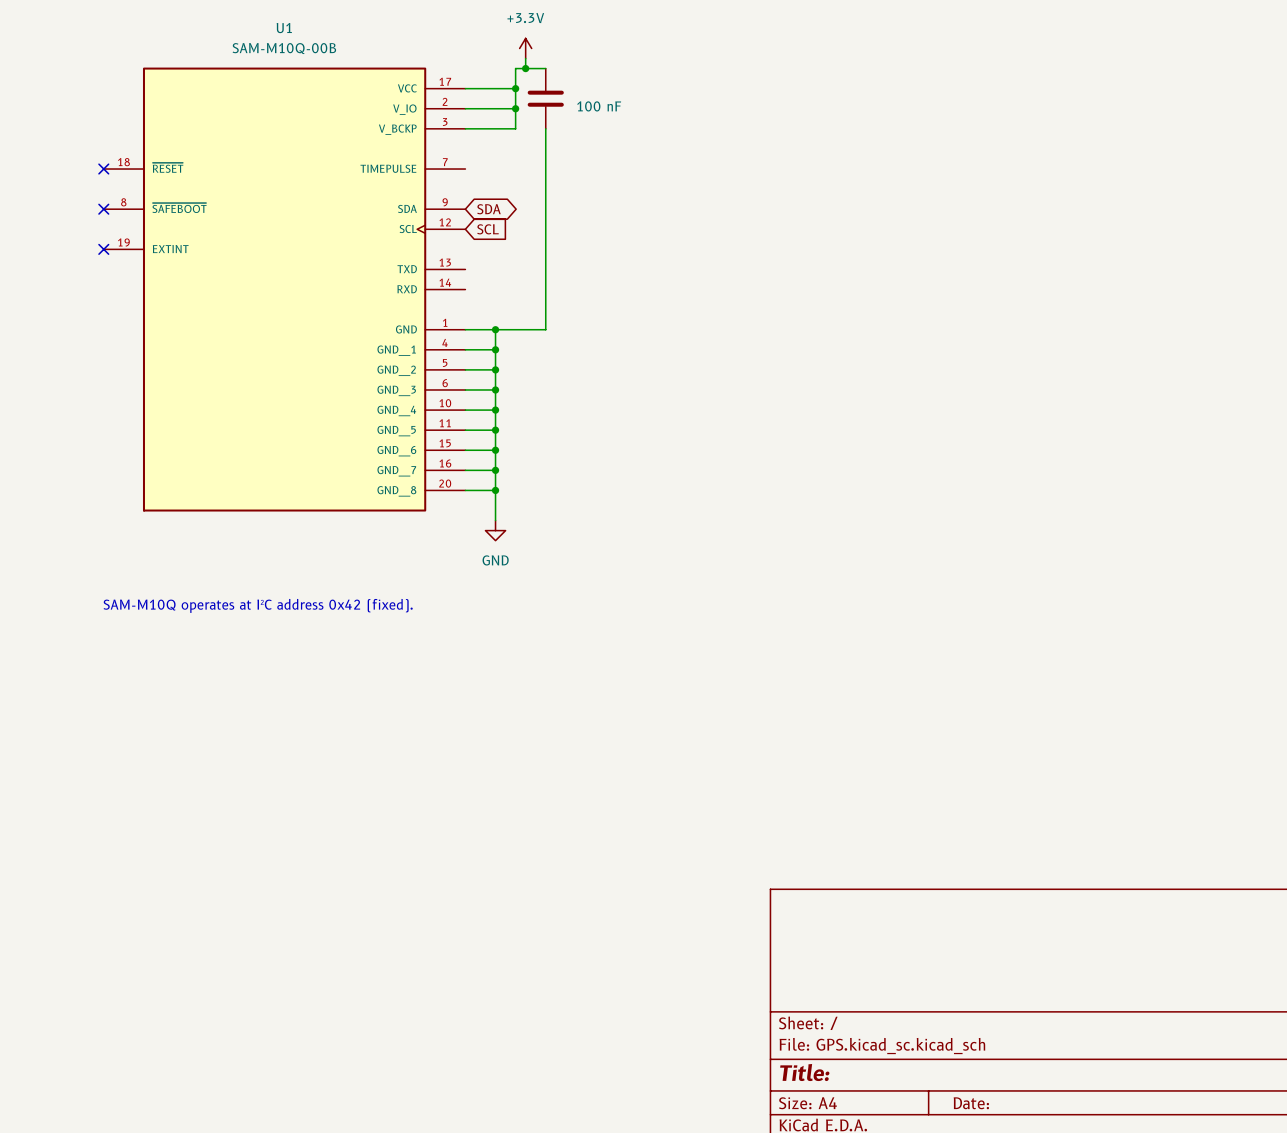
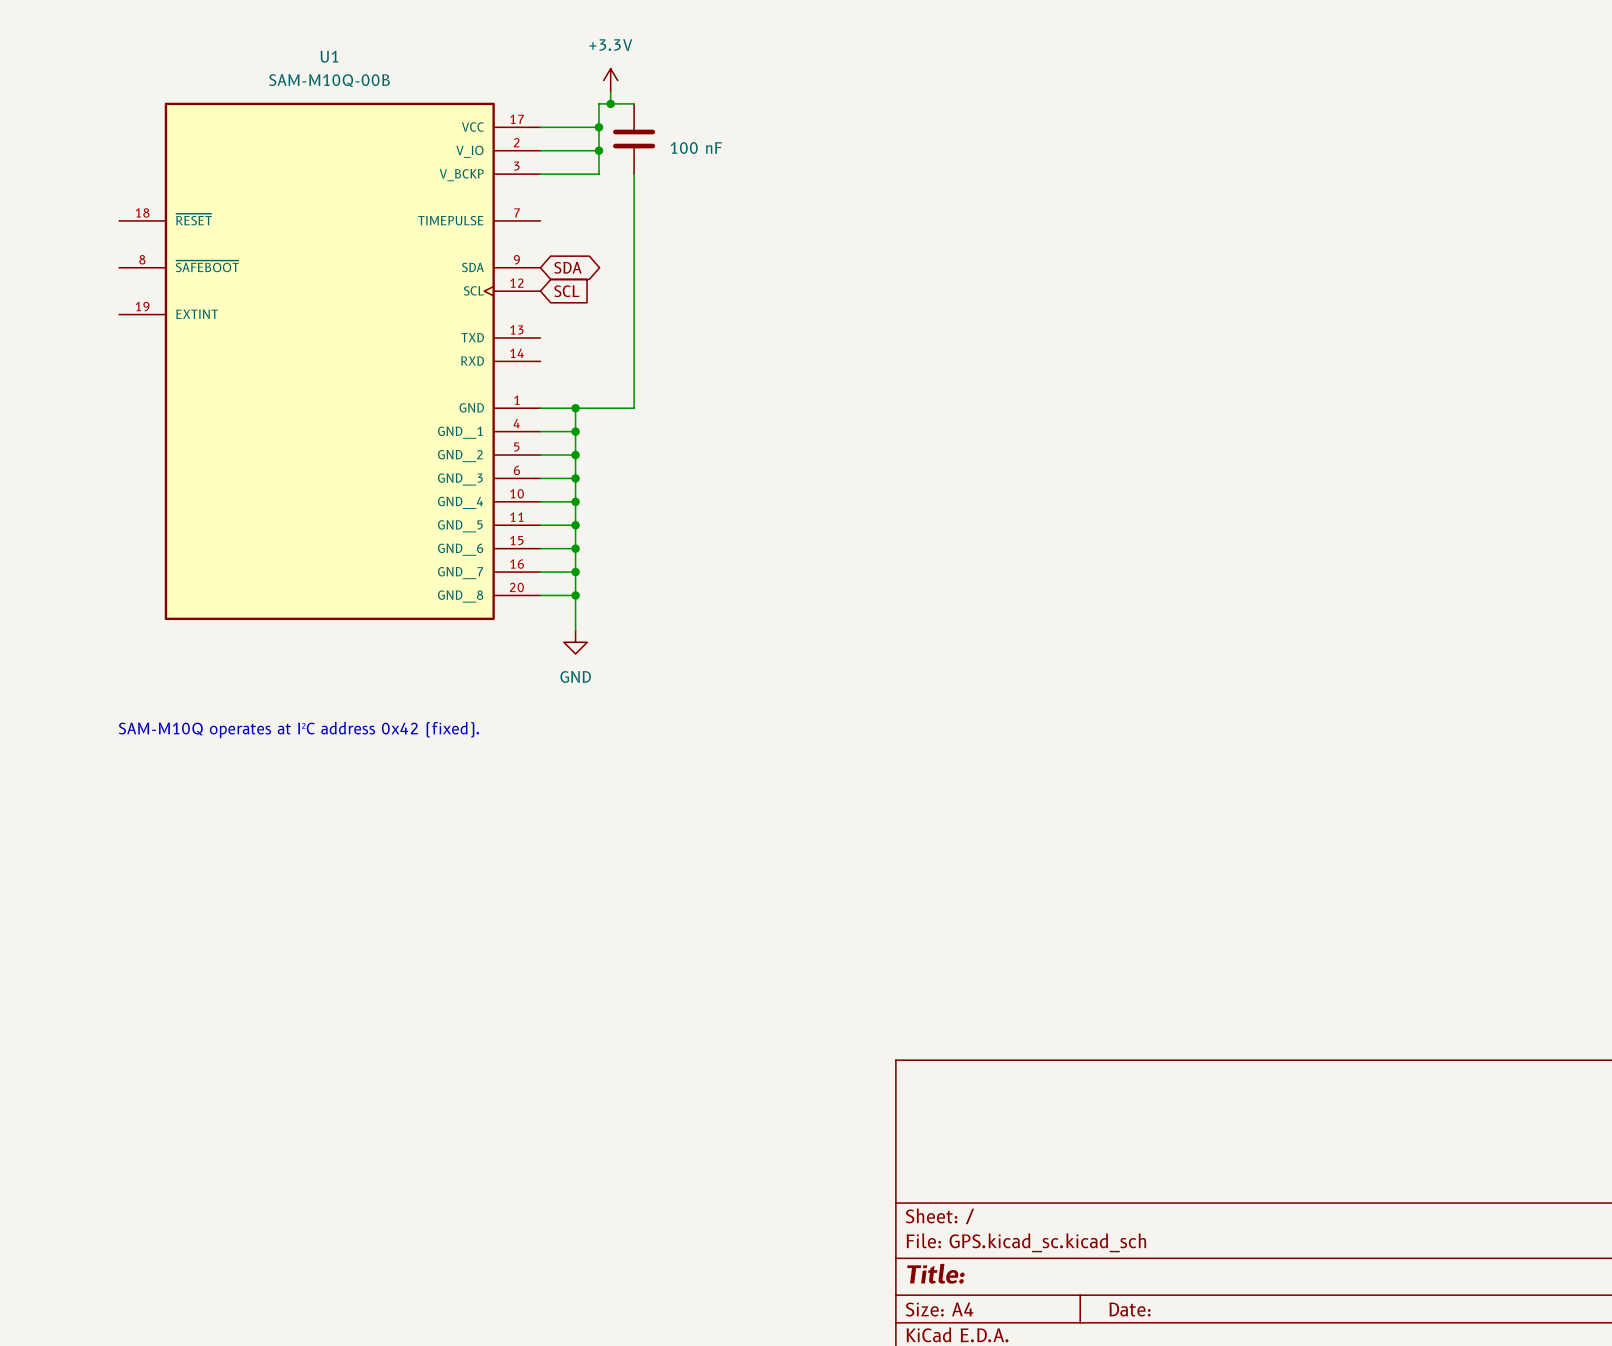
no-connect mark: (103, 169) -> none
no-connect mark: (103, 209) -> none
no-connect mark: (103, 249) -> none

